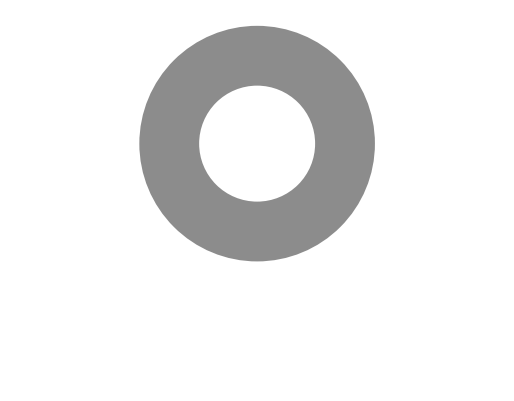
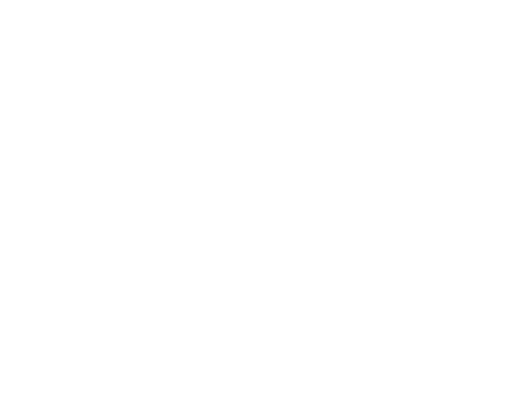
part: (257, 143) -> none

